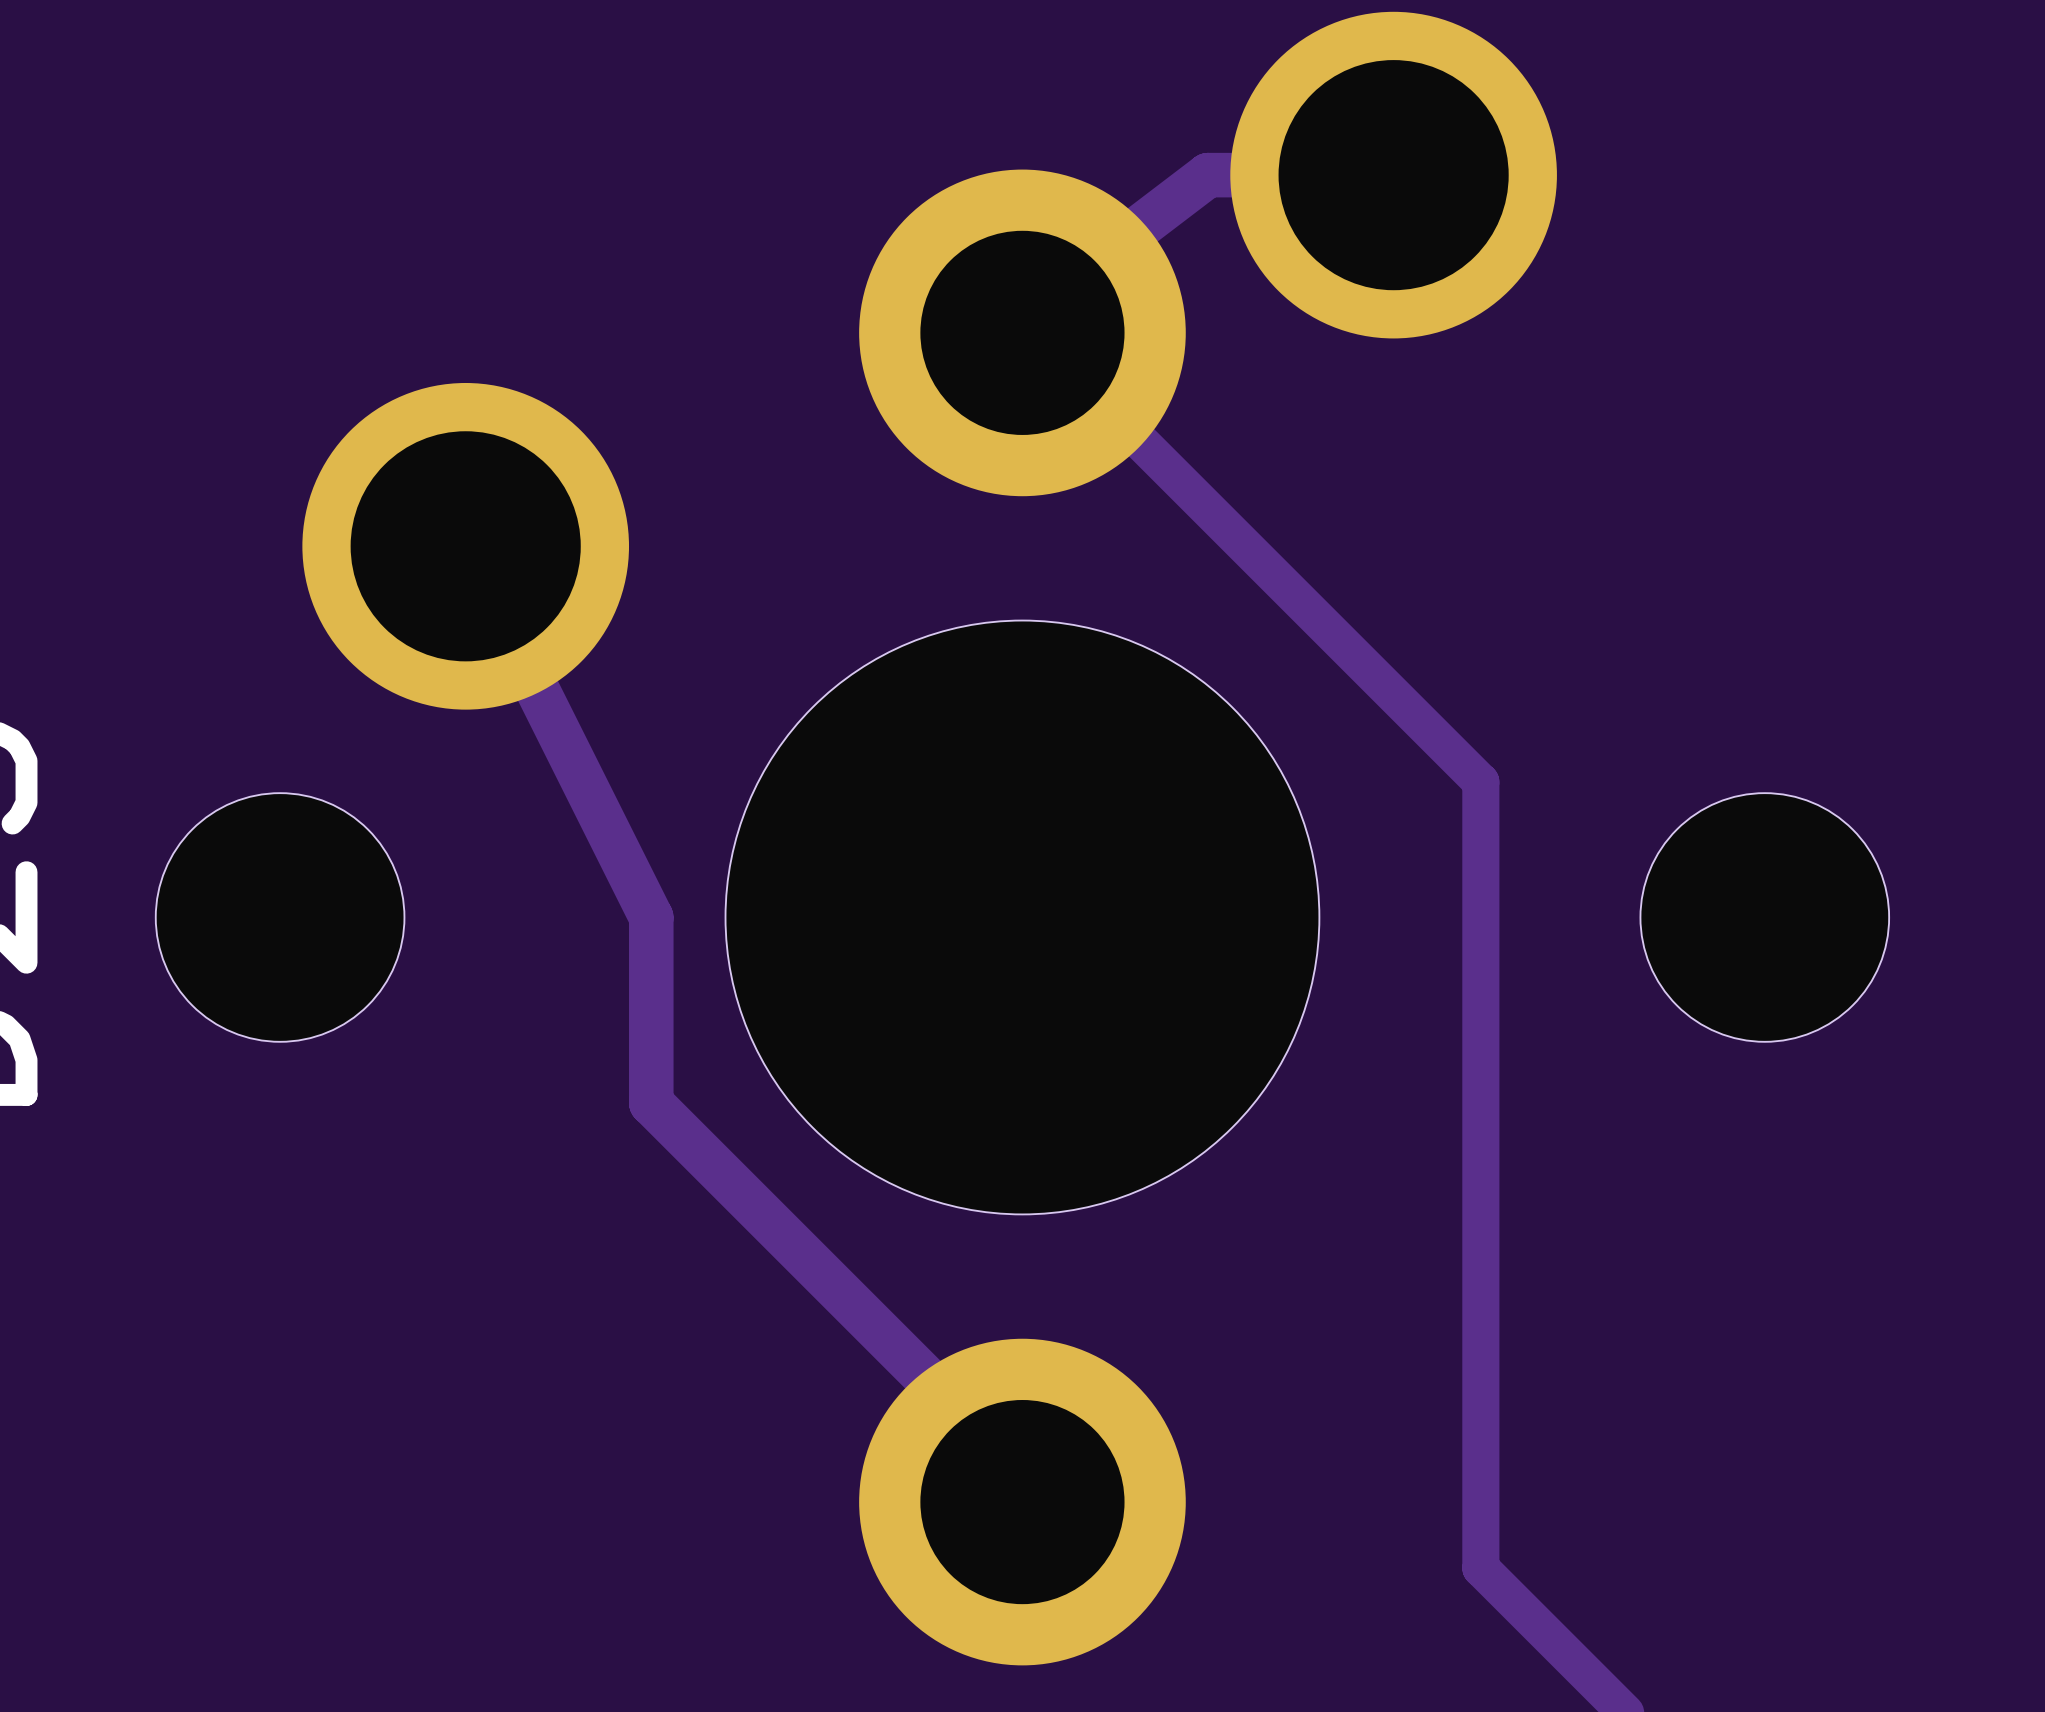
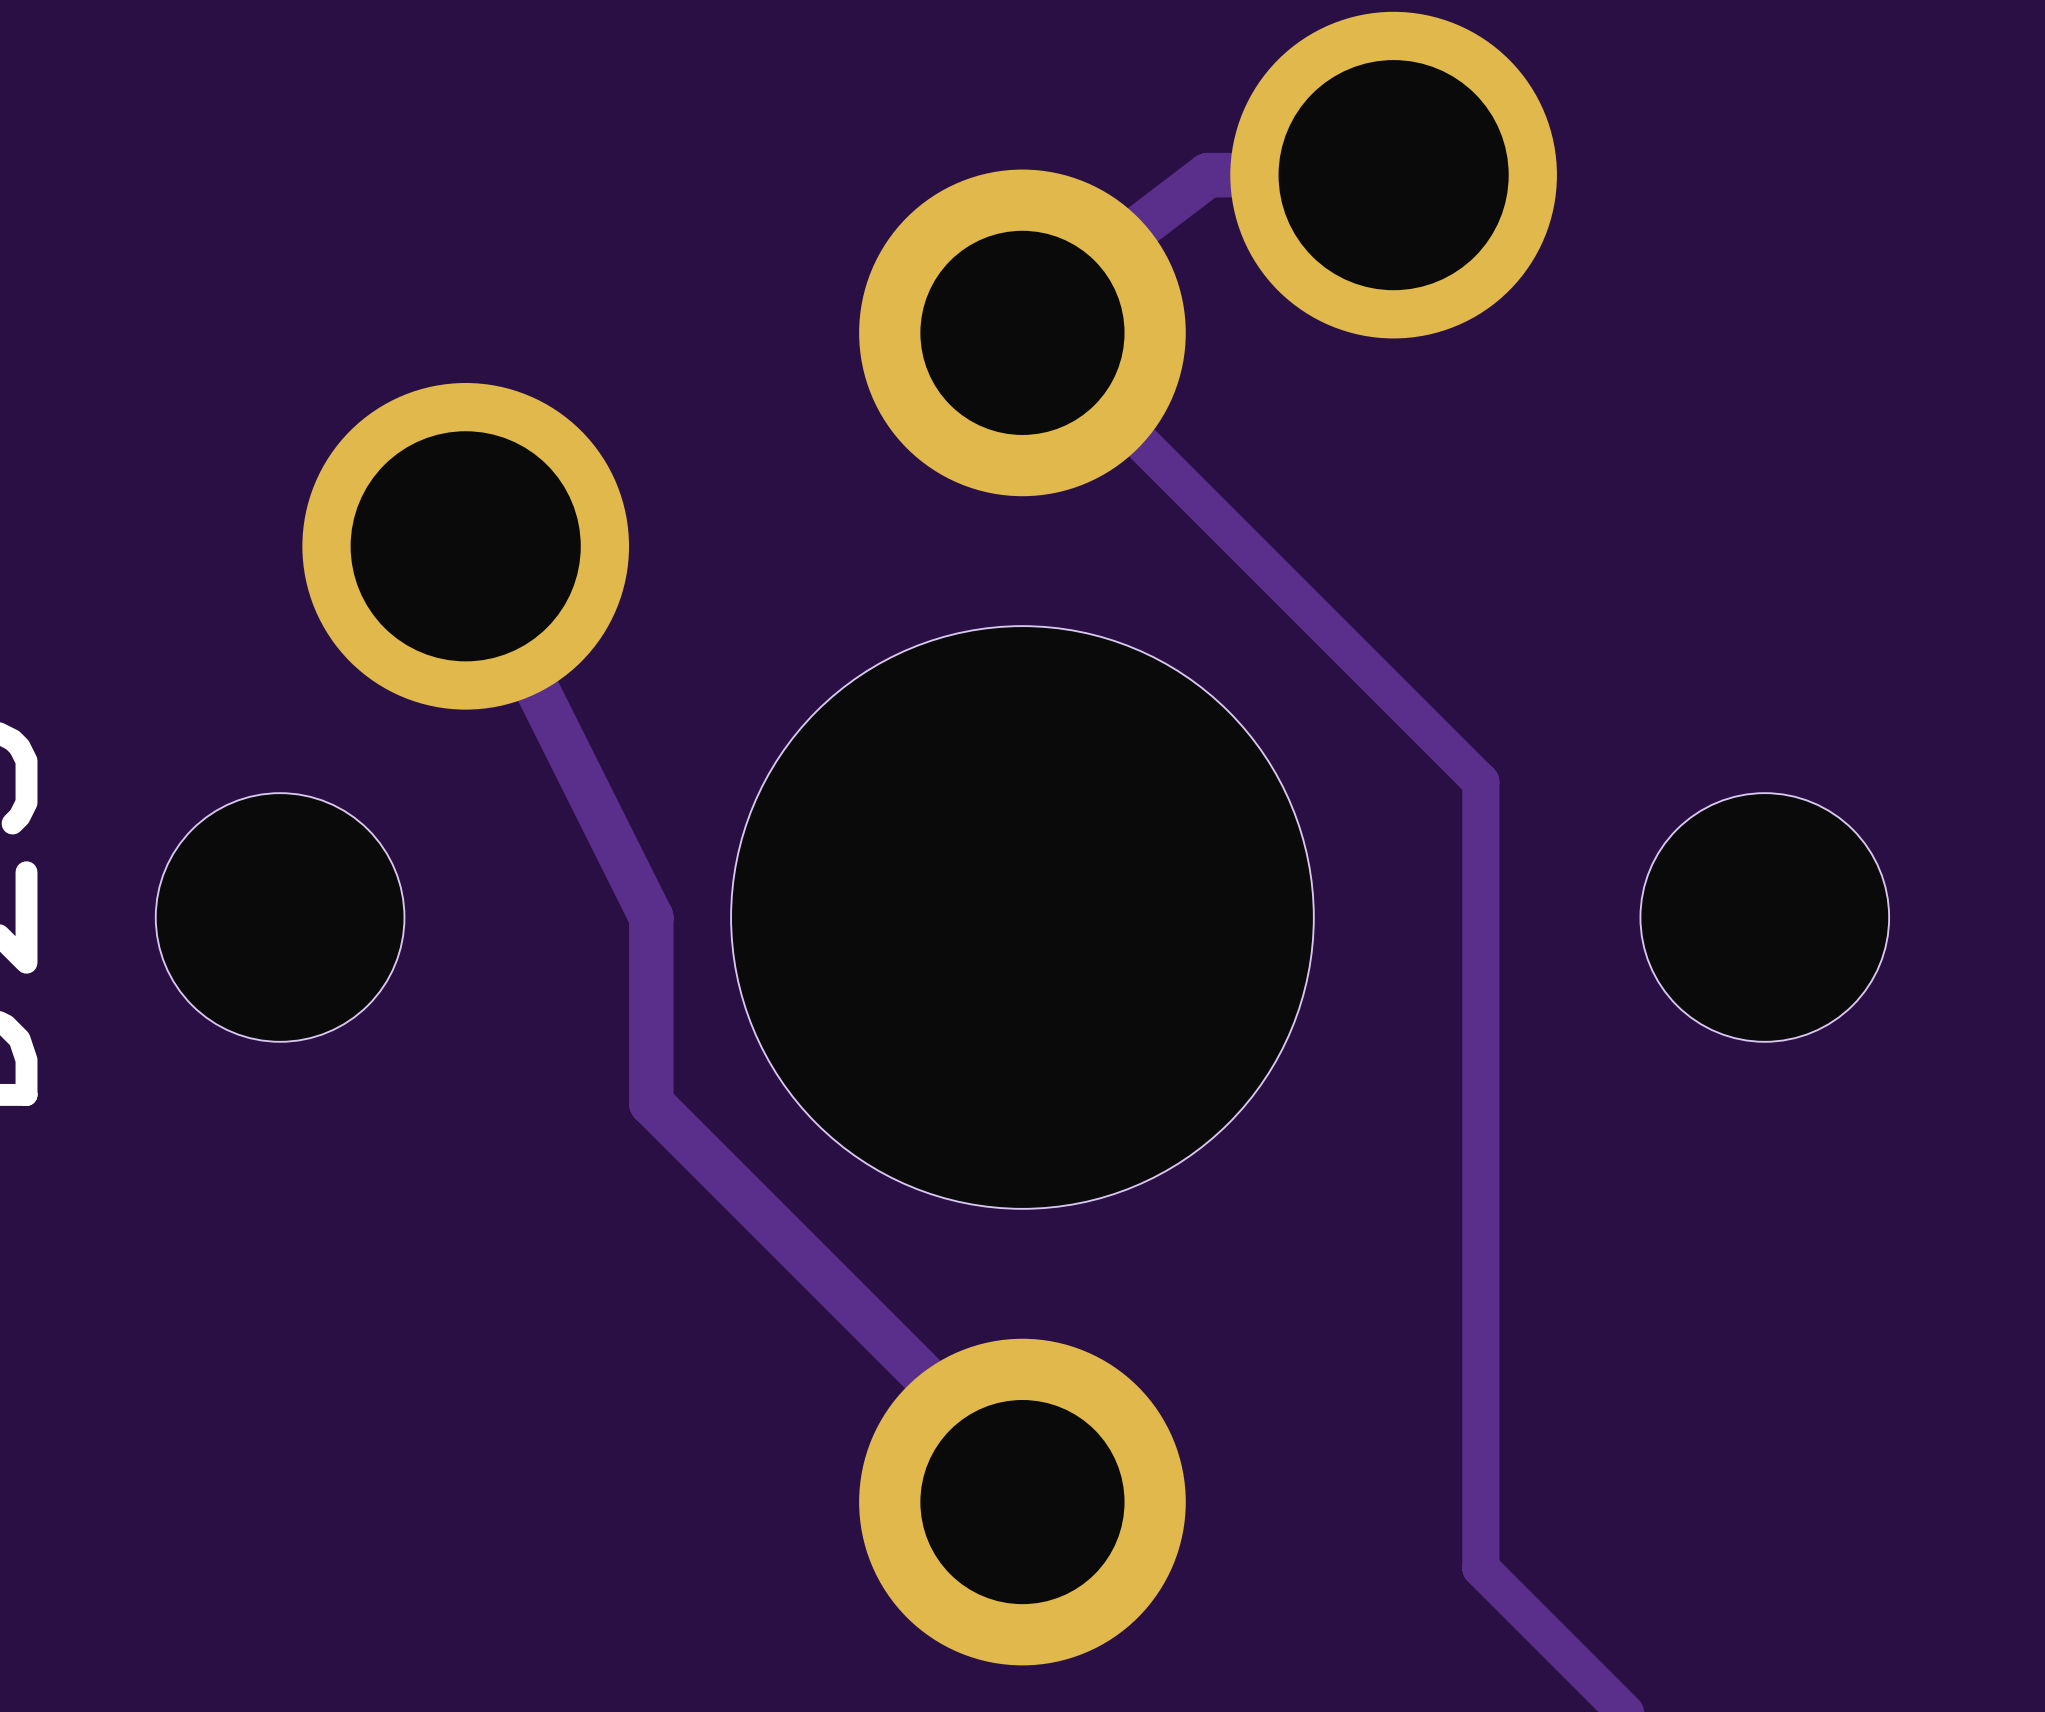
part footprint: [155, 11, 1890, 1666] -> [155, 11, 1890, 1666]

